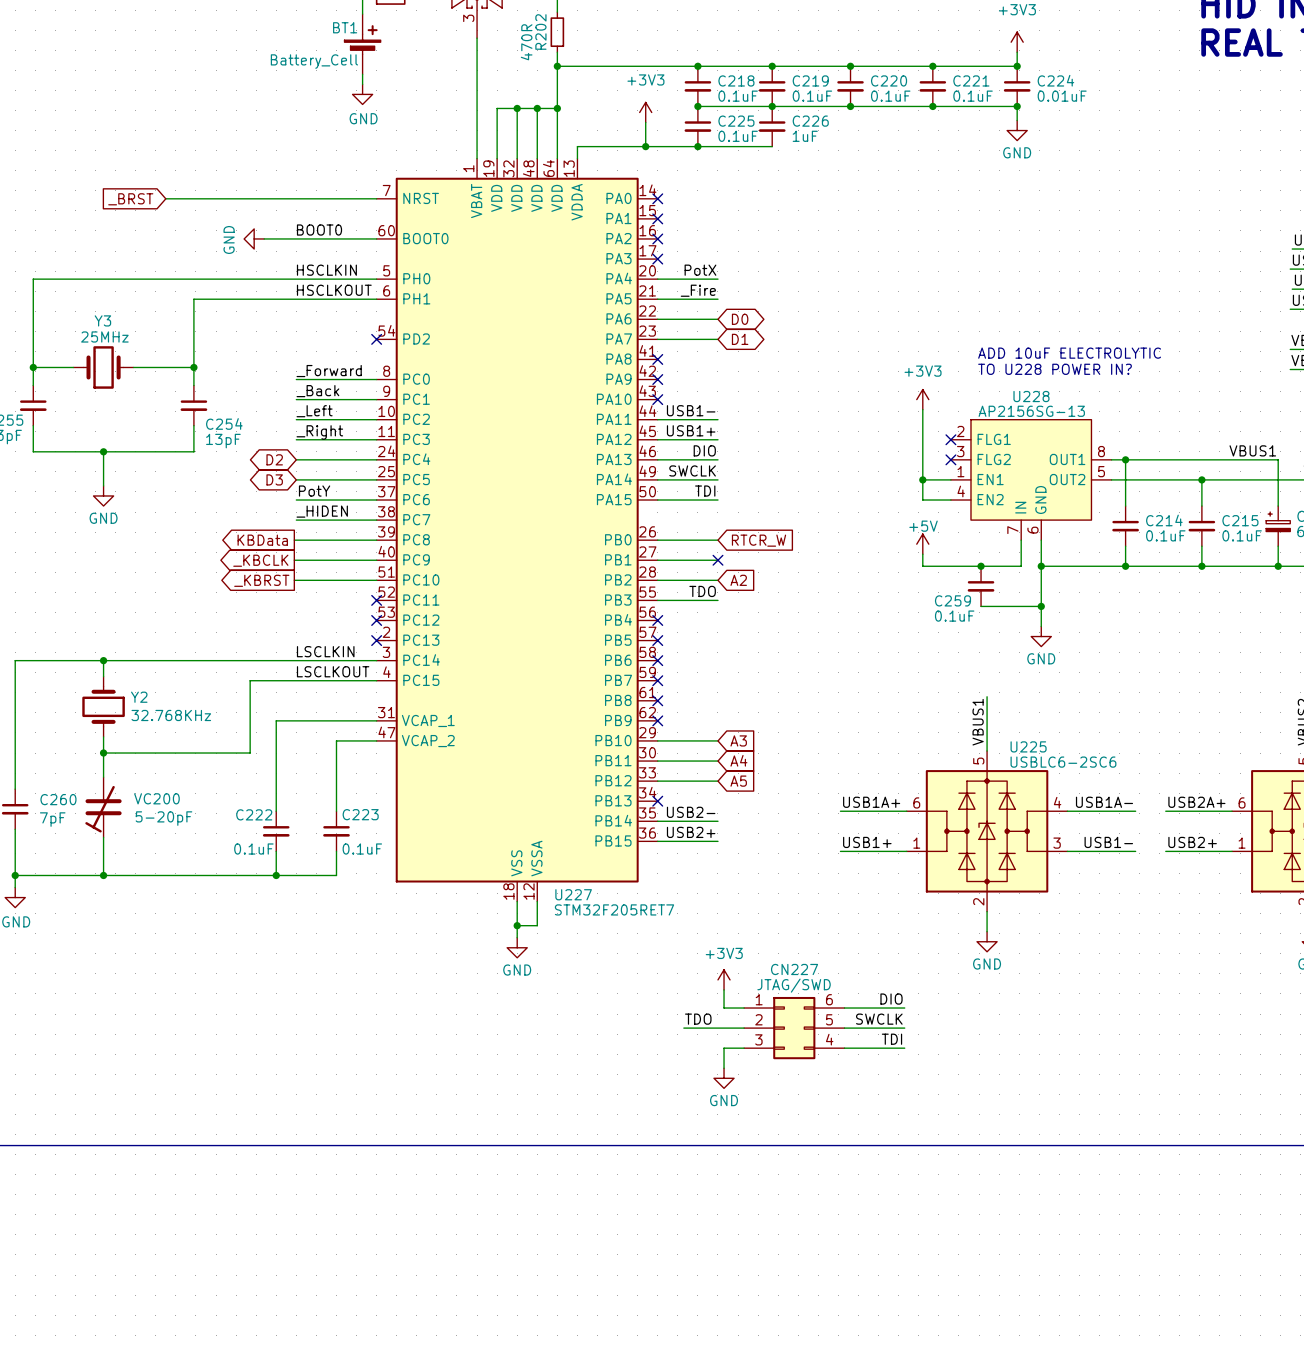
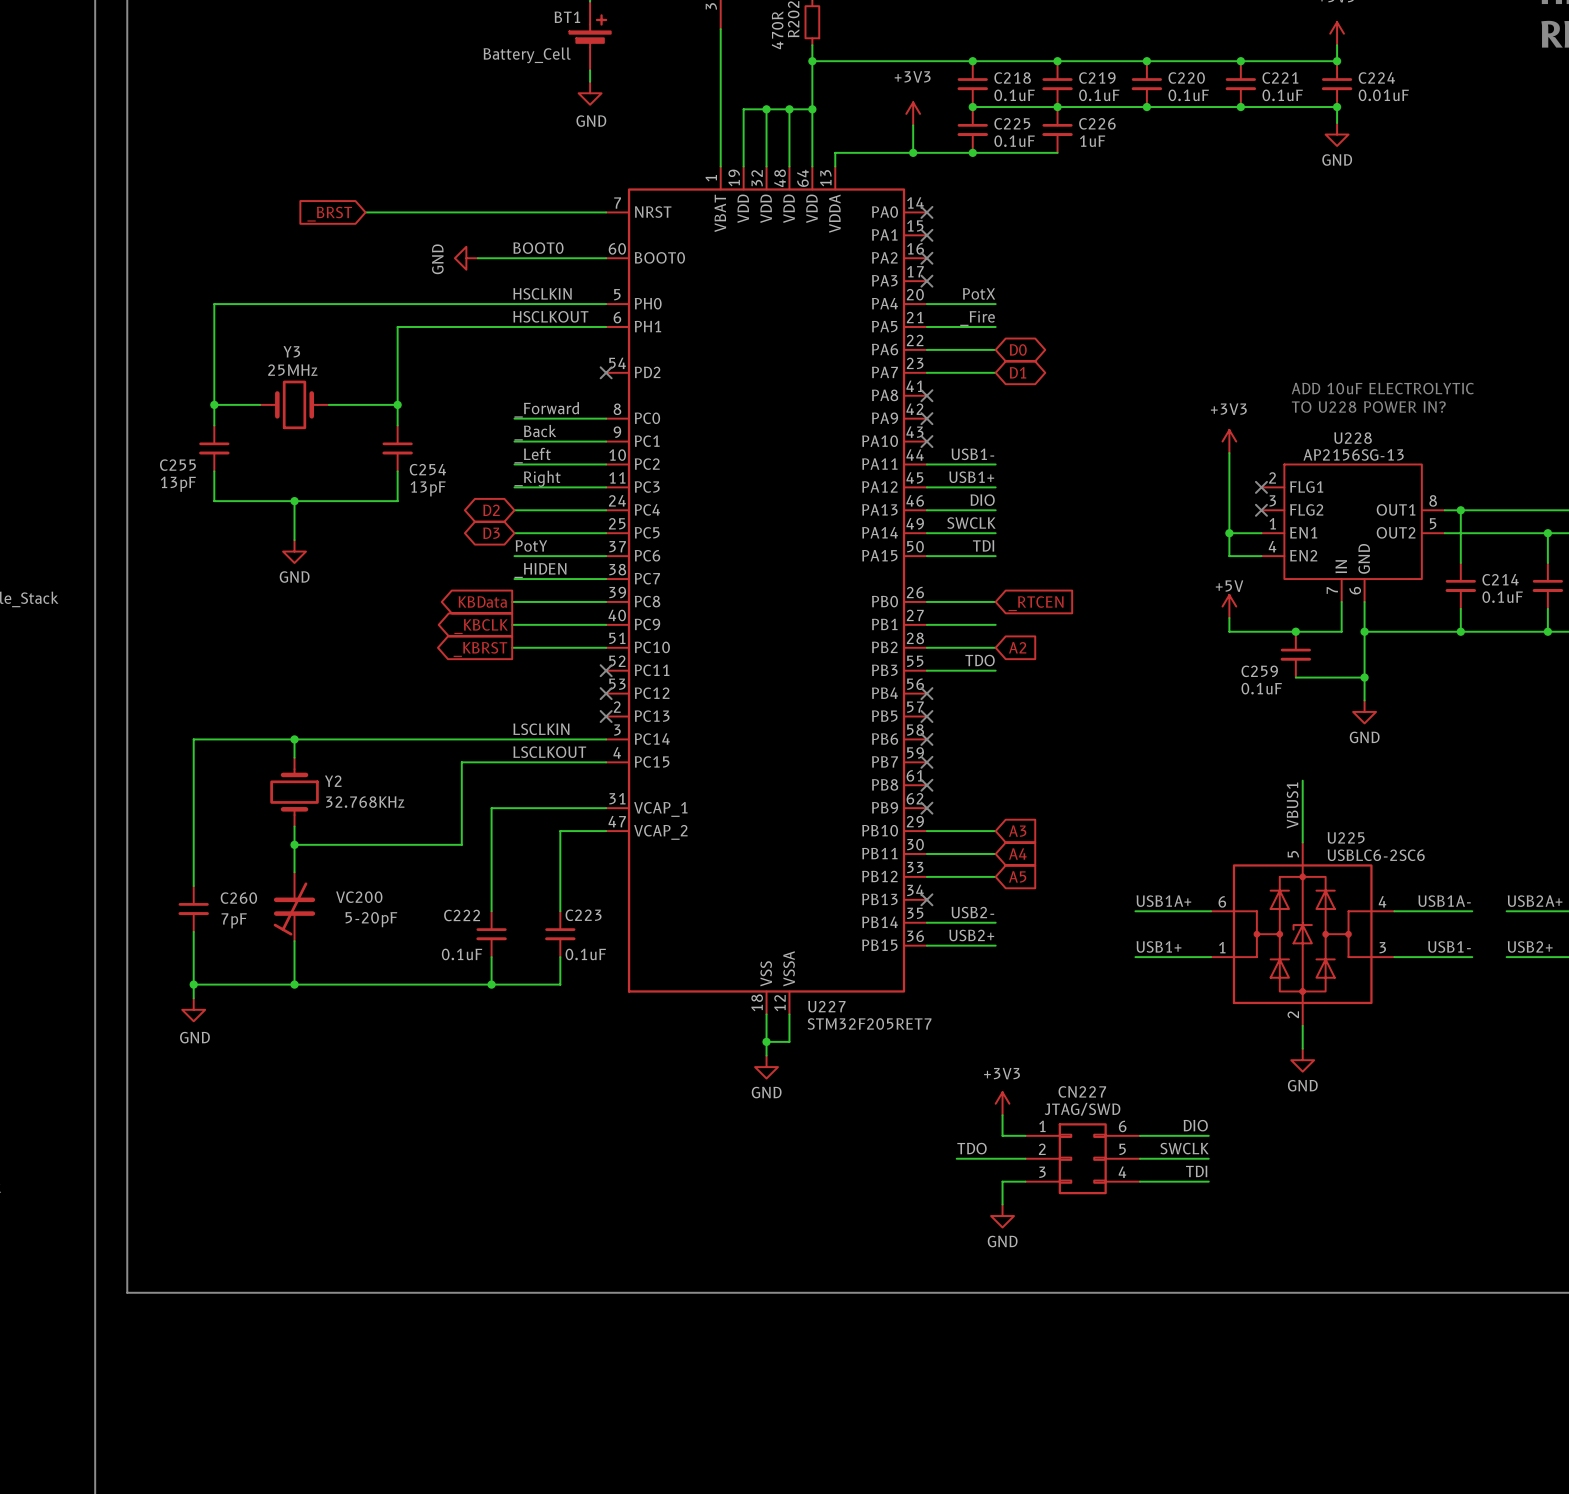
global label: RTCR_W (759, 540) -> _RTCEN (1036, 603)
no-connect mark: (717, 560) -> none

